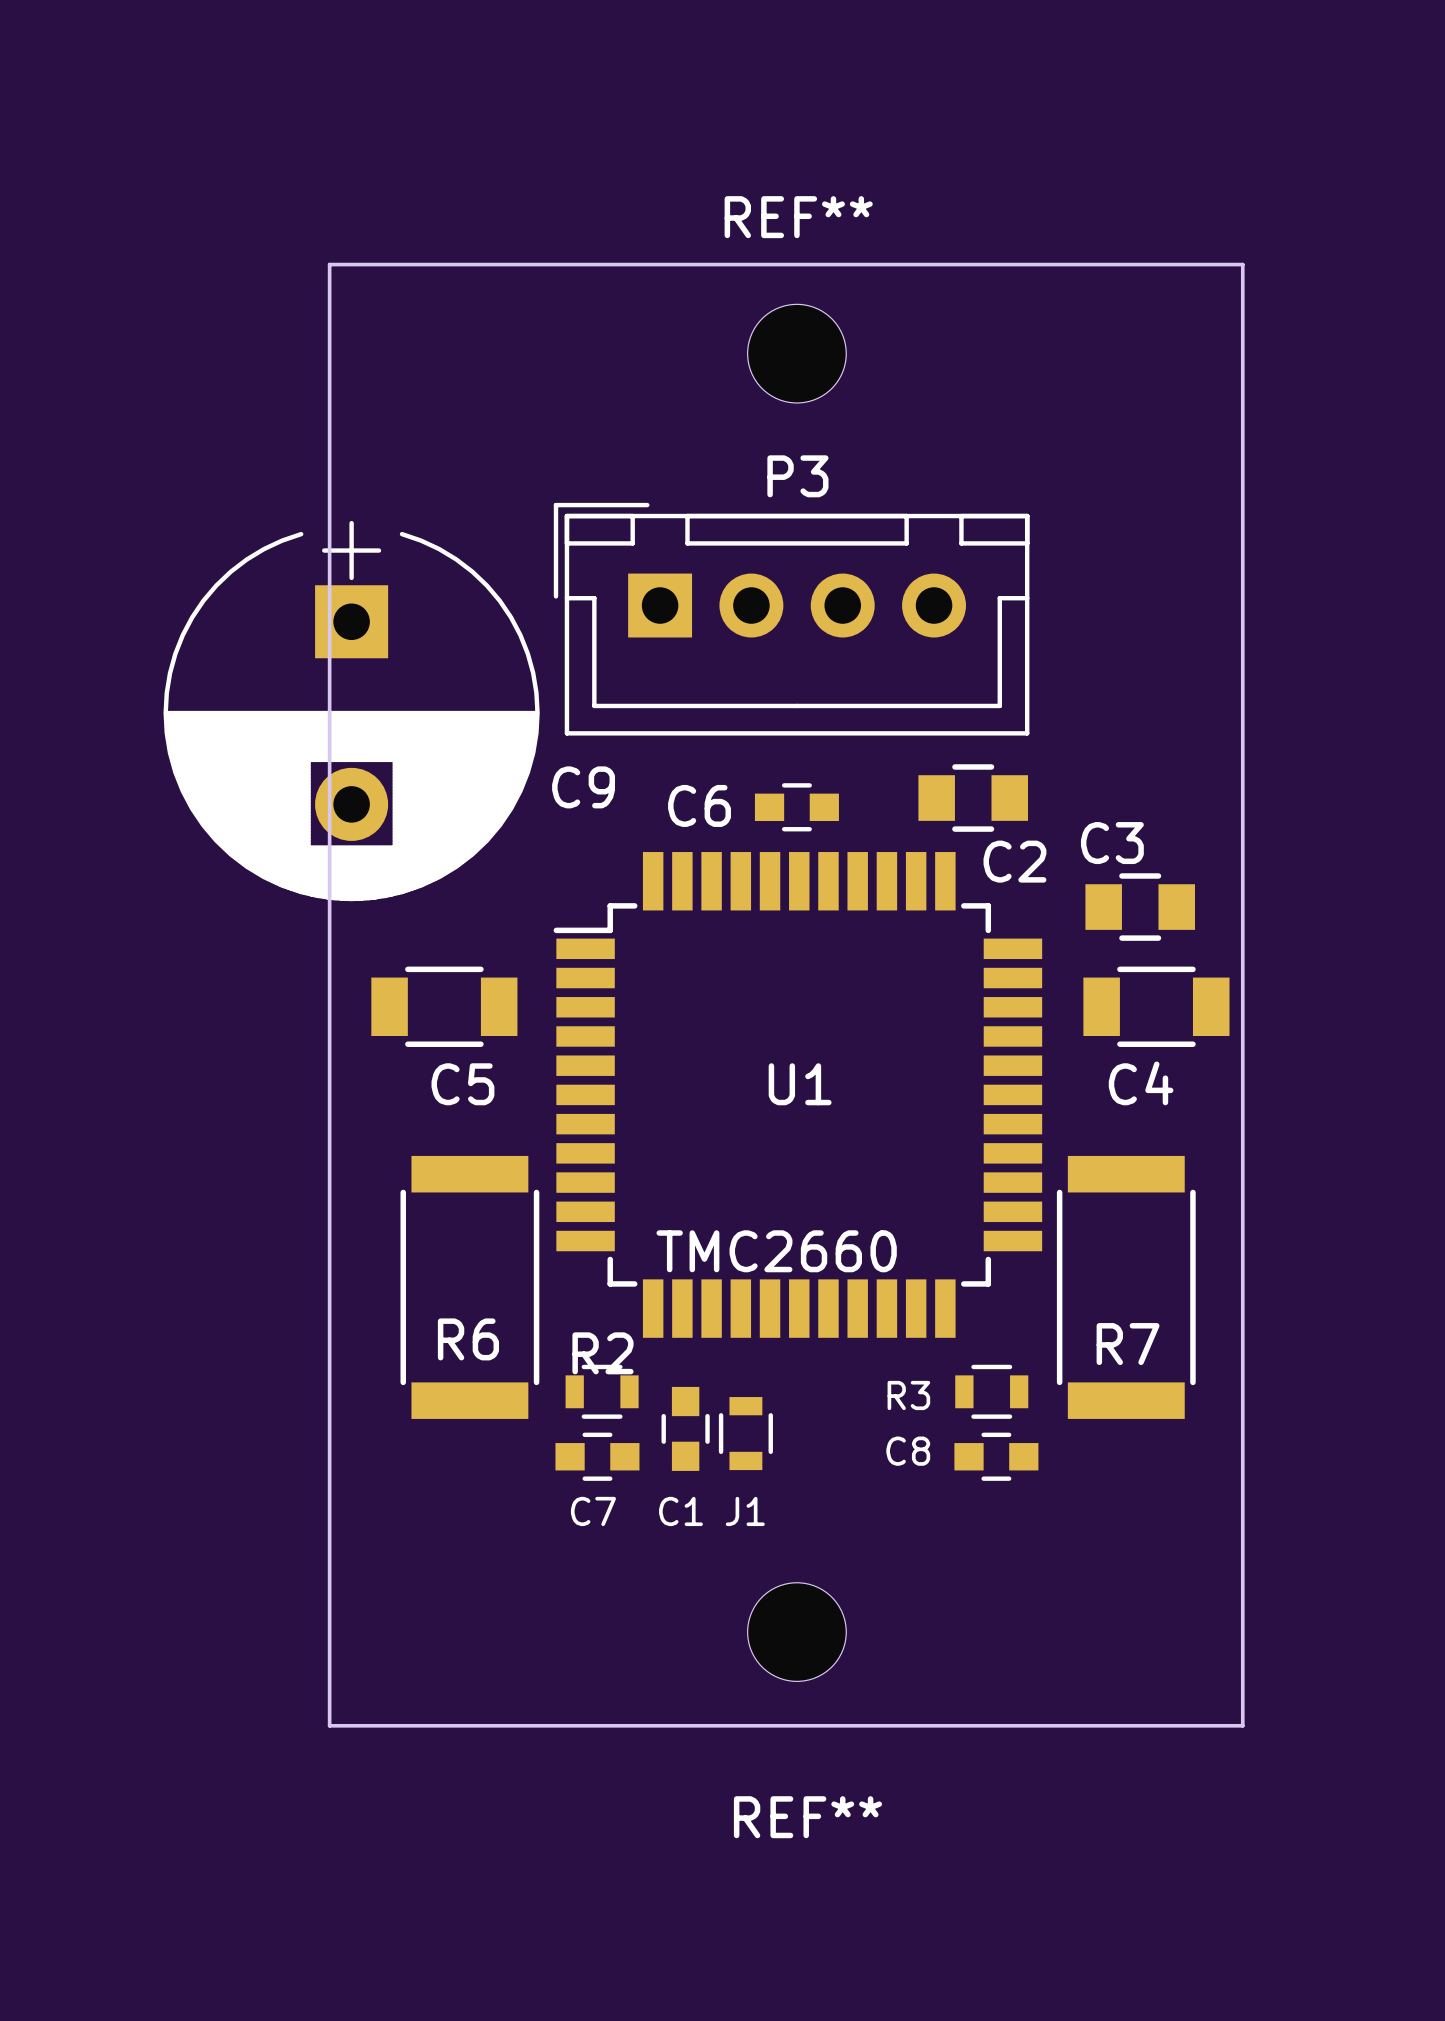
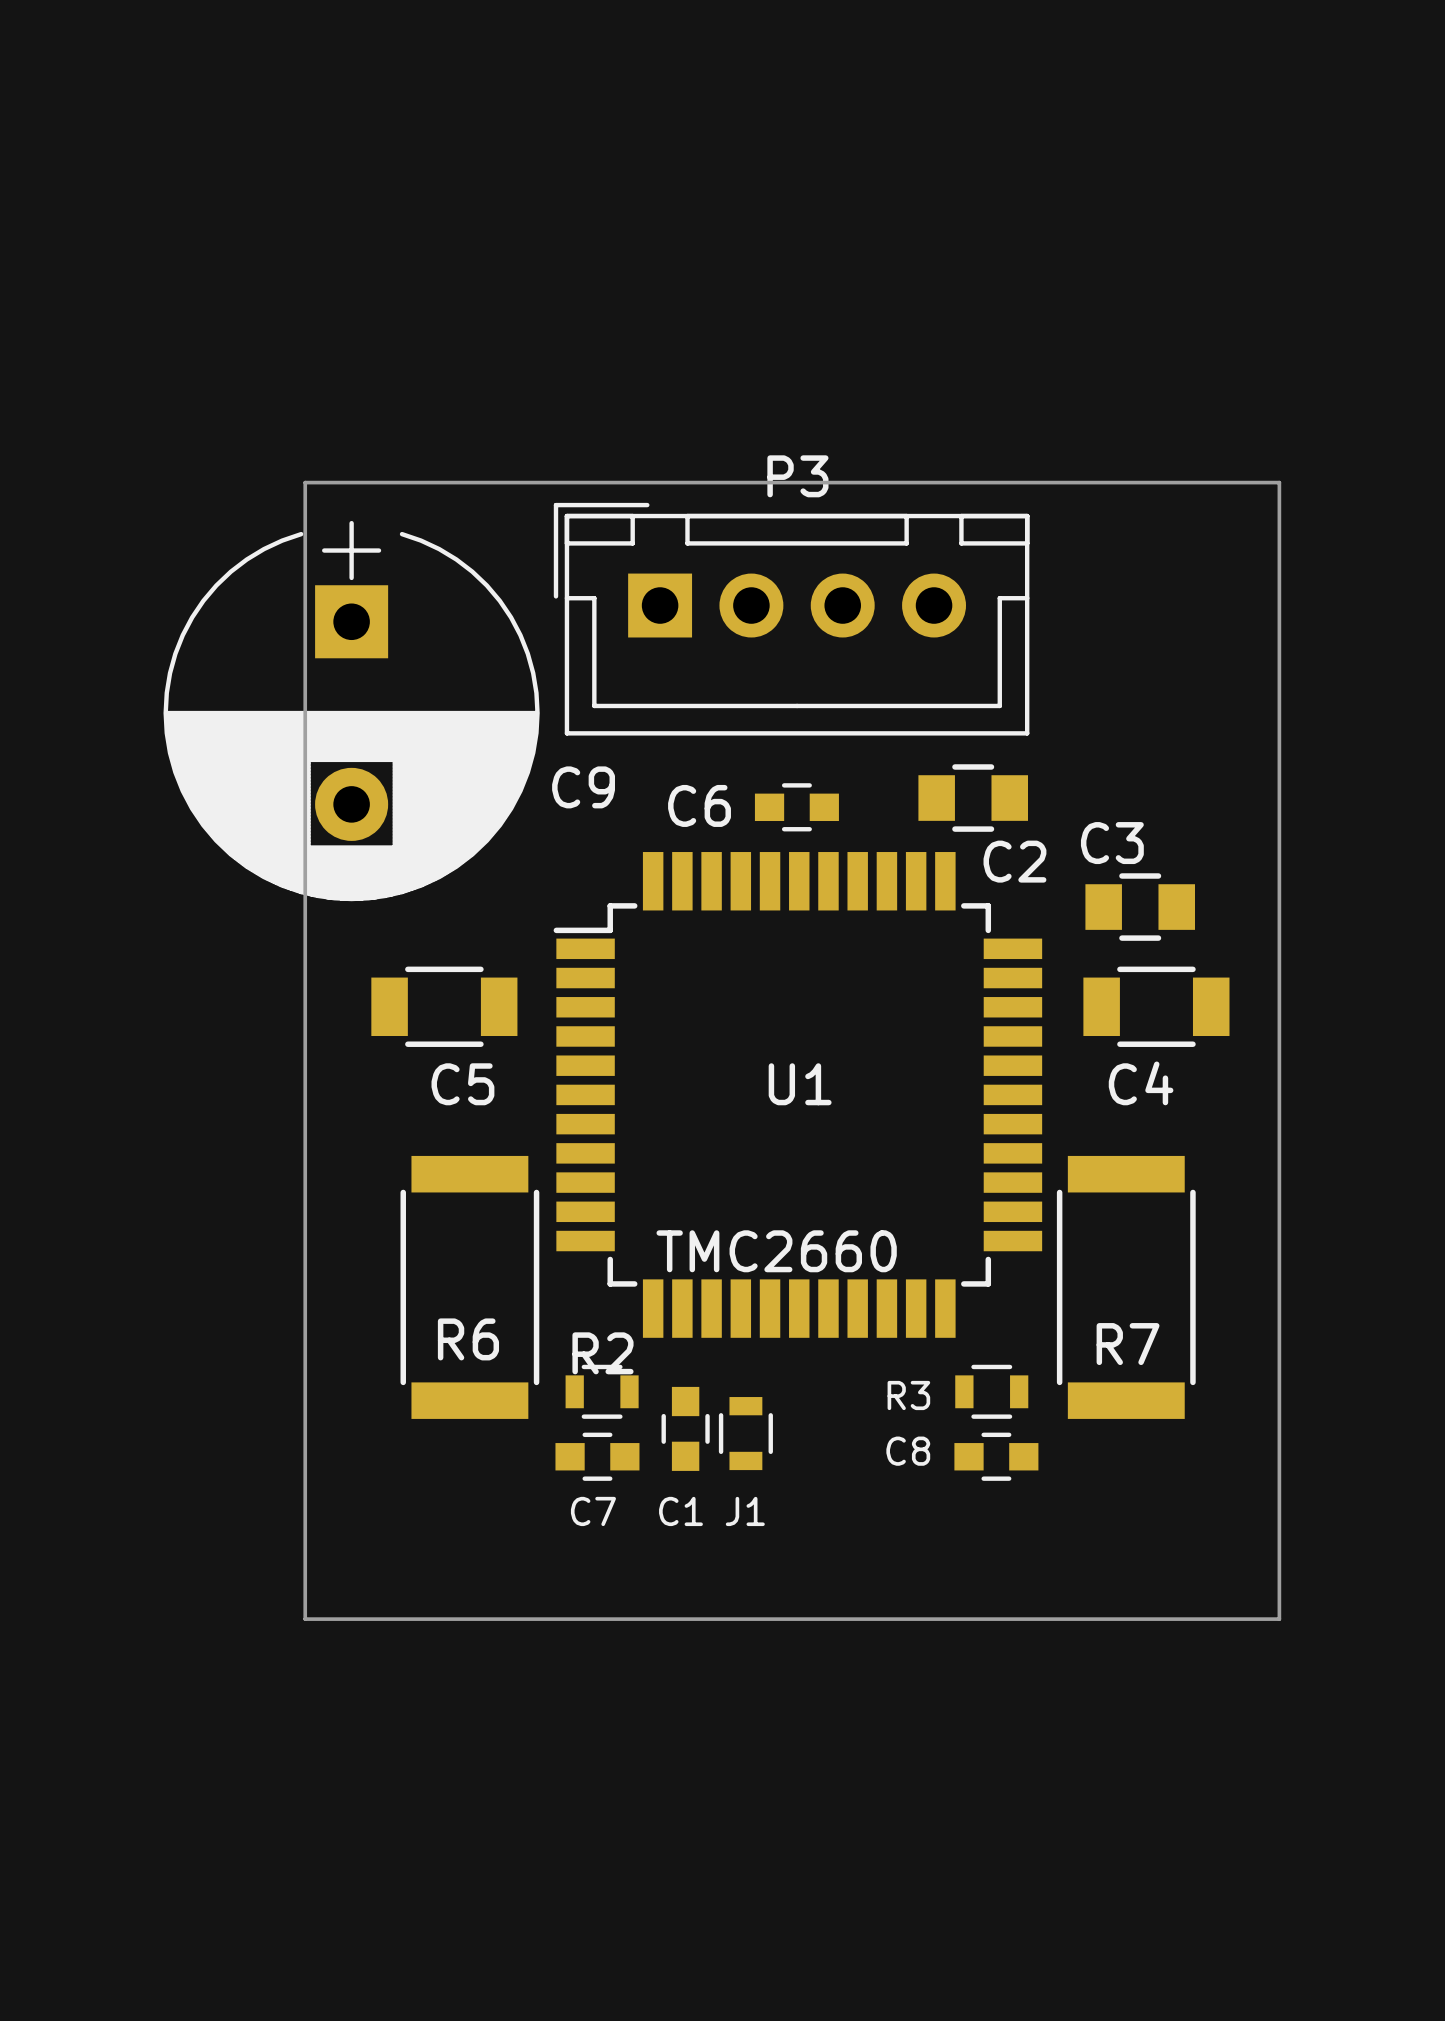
board edge: (329, 264) (329, 1725) (1242, 1725) (1242, 264) (329, 264) -> (305, 482) (305, 1619) (1279, 1619) (1279, 482) (305, 482)
REF**: (796, 353) -> none
REF**: (796, 1632) -> none

